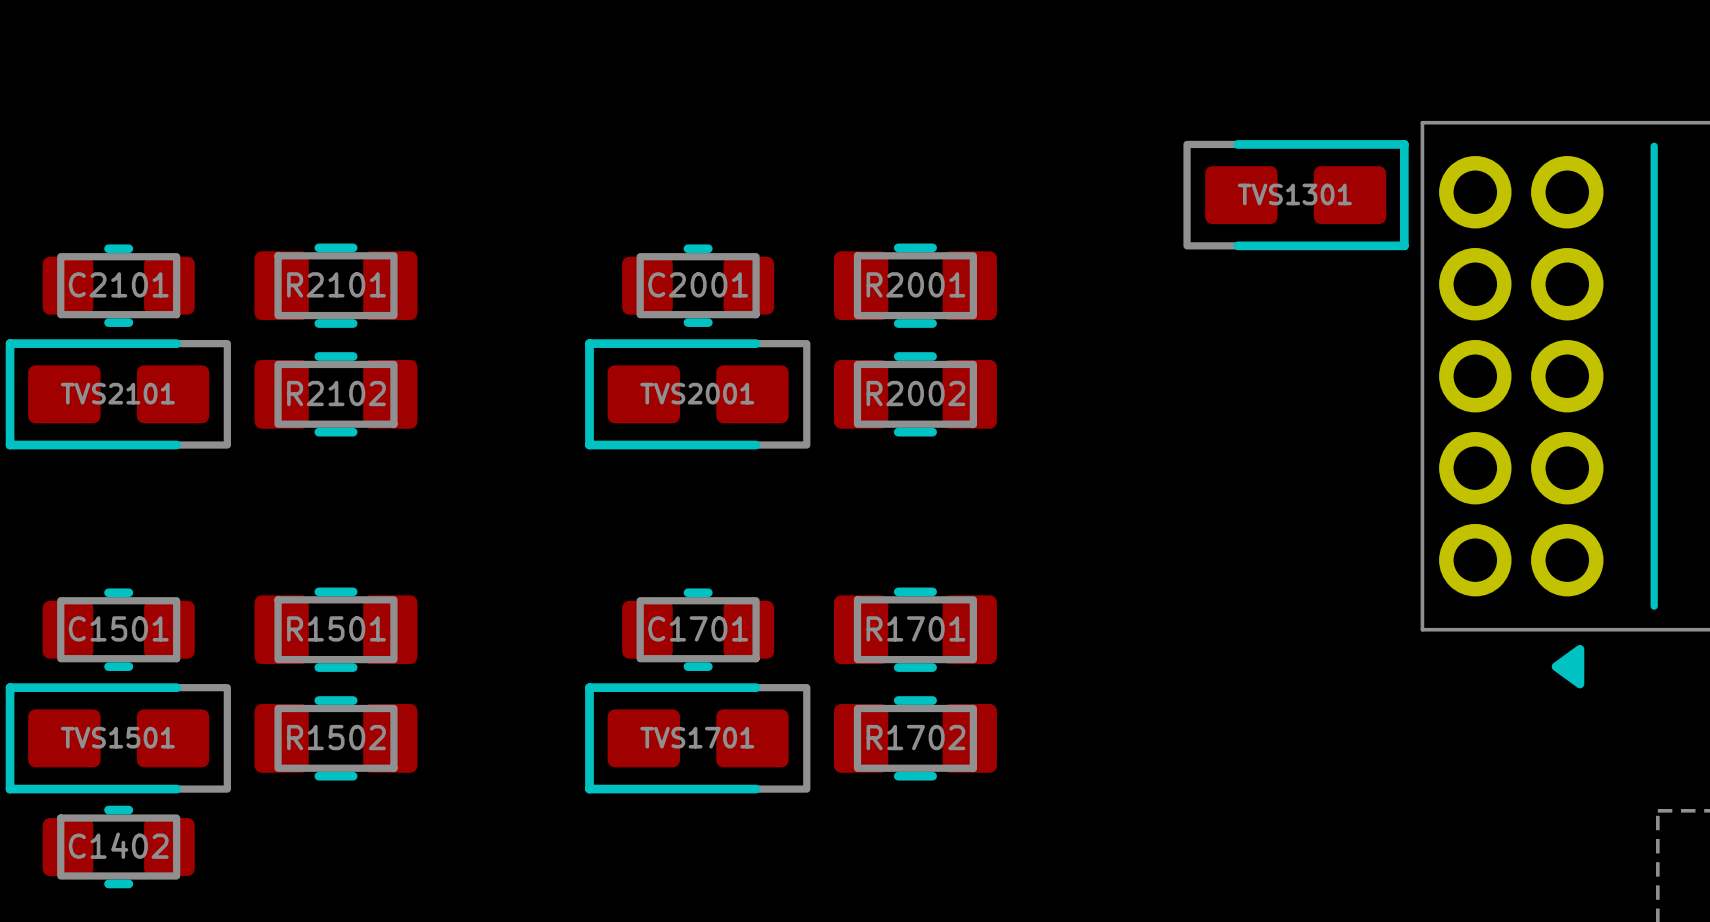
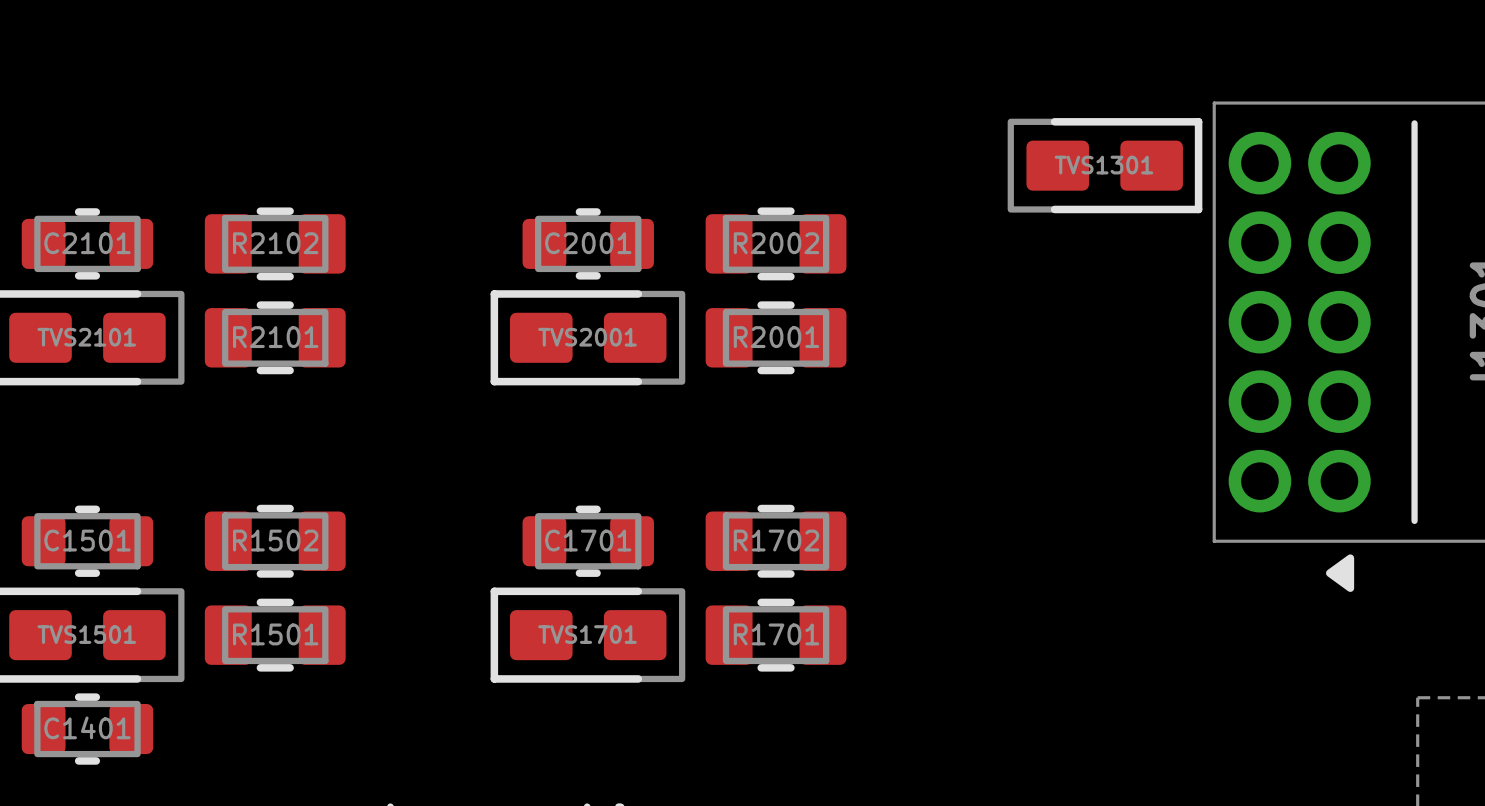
R2101 name: R2101 (336, 284) -> R2102 (275, 243)
R2001 name: R2001 (915, 284) -> R2002 (776, 243)
R2102 name: R2102 (336, 393) -> R2101 (275, 337)
R2002 name: R2002 (915, 393) -> R2001 (776, 337)
R1501 name: R1501 (336, 628) -> R1502 (275, 540)
R1701 name: R1701 (915, 628) -> R1702 (776, 540)
R1502 name: R1502 (336, 737) -> R1501 (275, 634)
R1702 name: R1702 (915, 737) -> R1701 (776, 634)
C1402 name: C1402 (118, 845) -> C1401 (87, 727)

